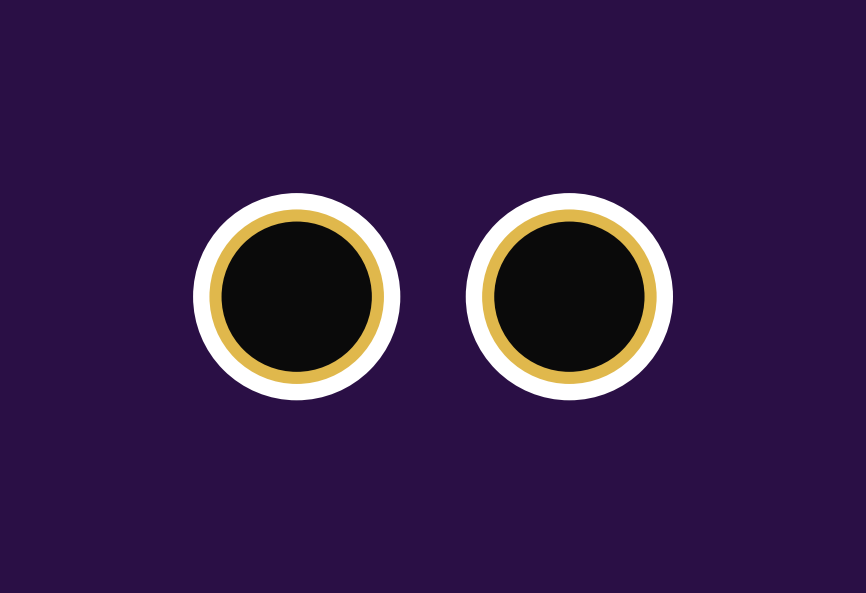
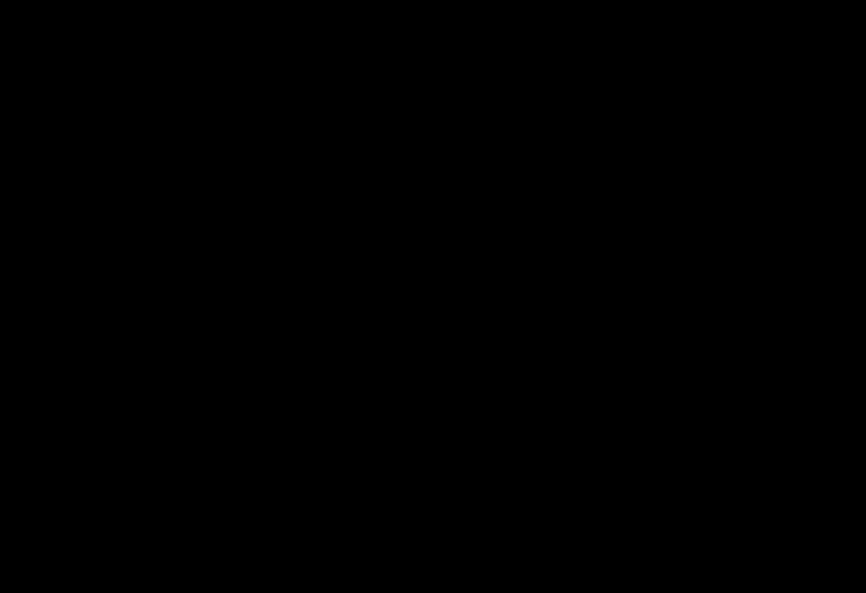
part: (296, 296) -> none
part: (569, 296) -> none

